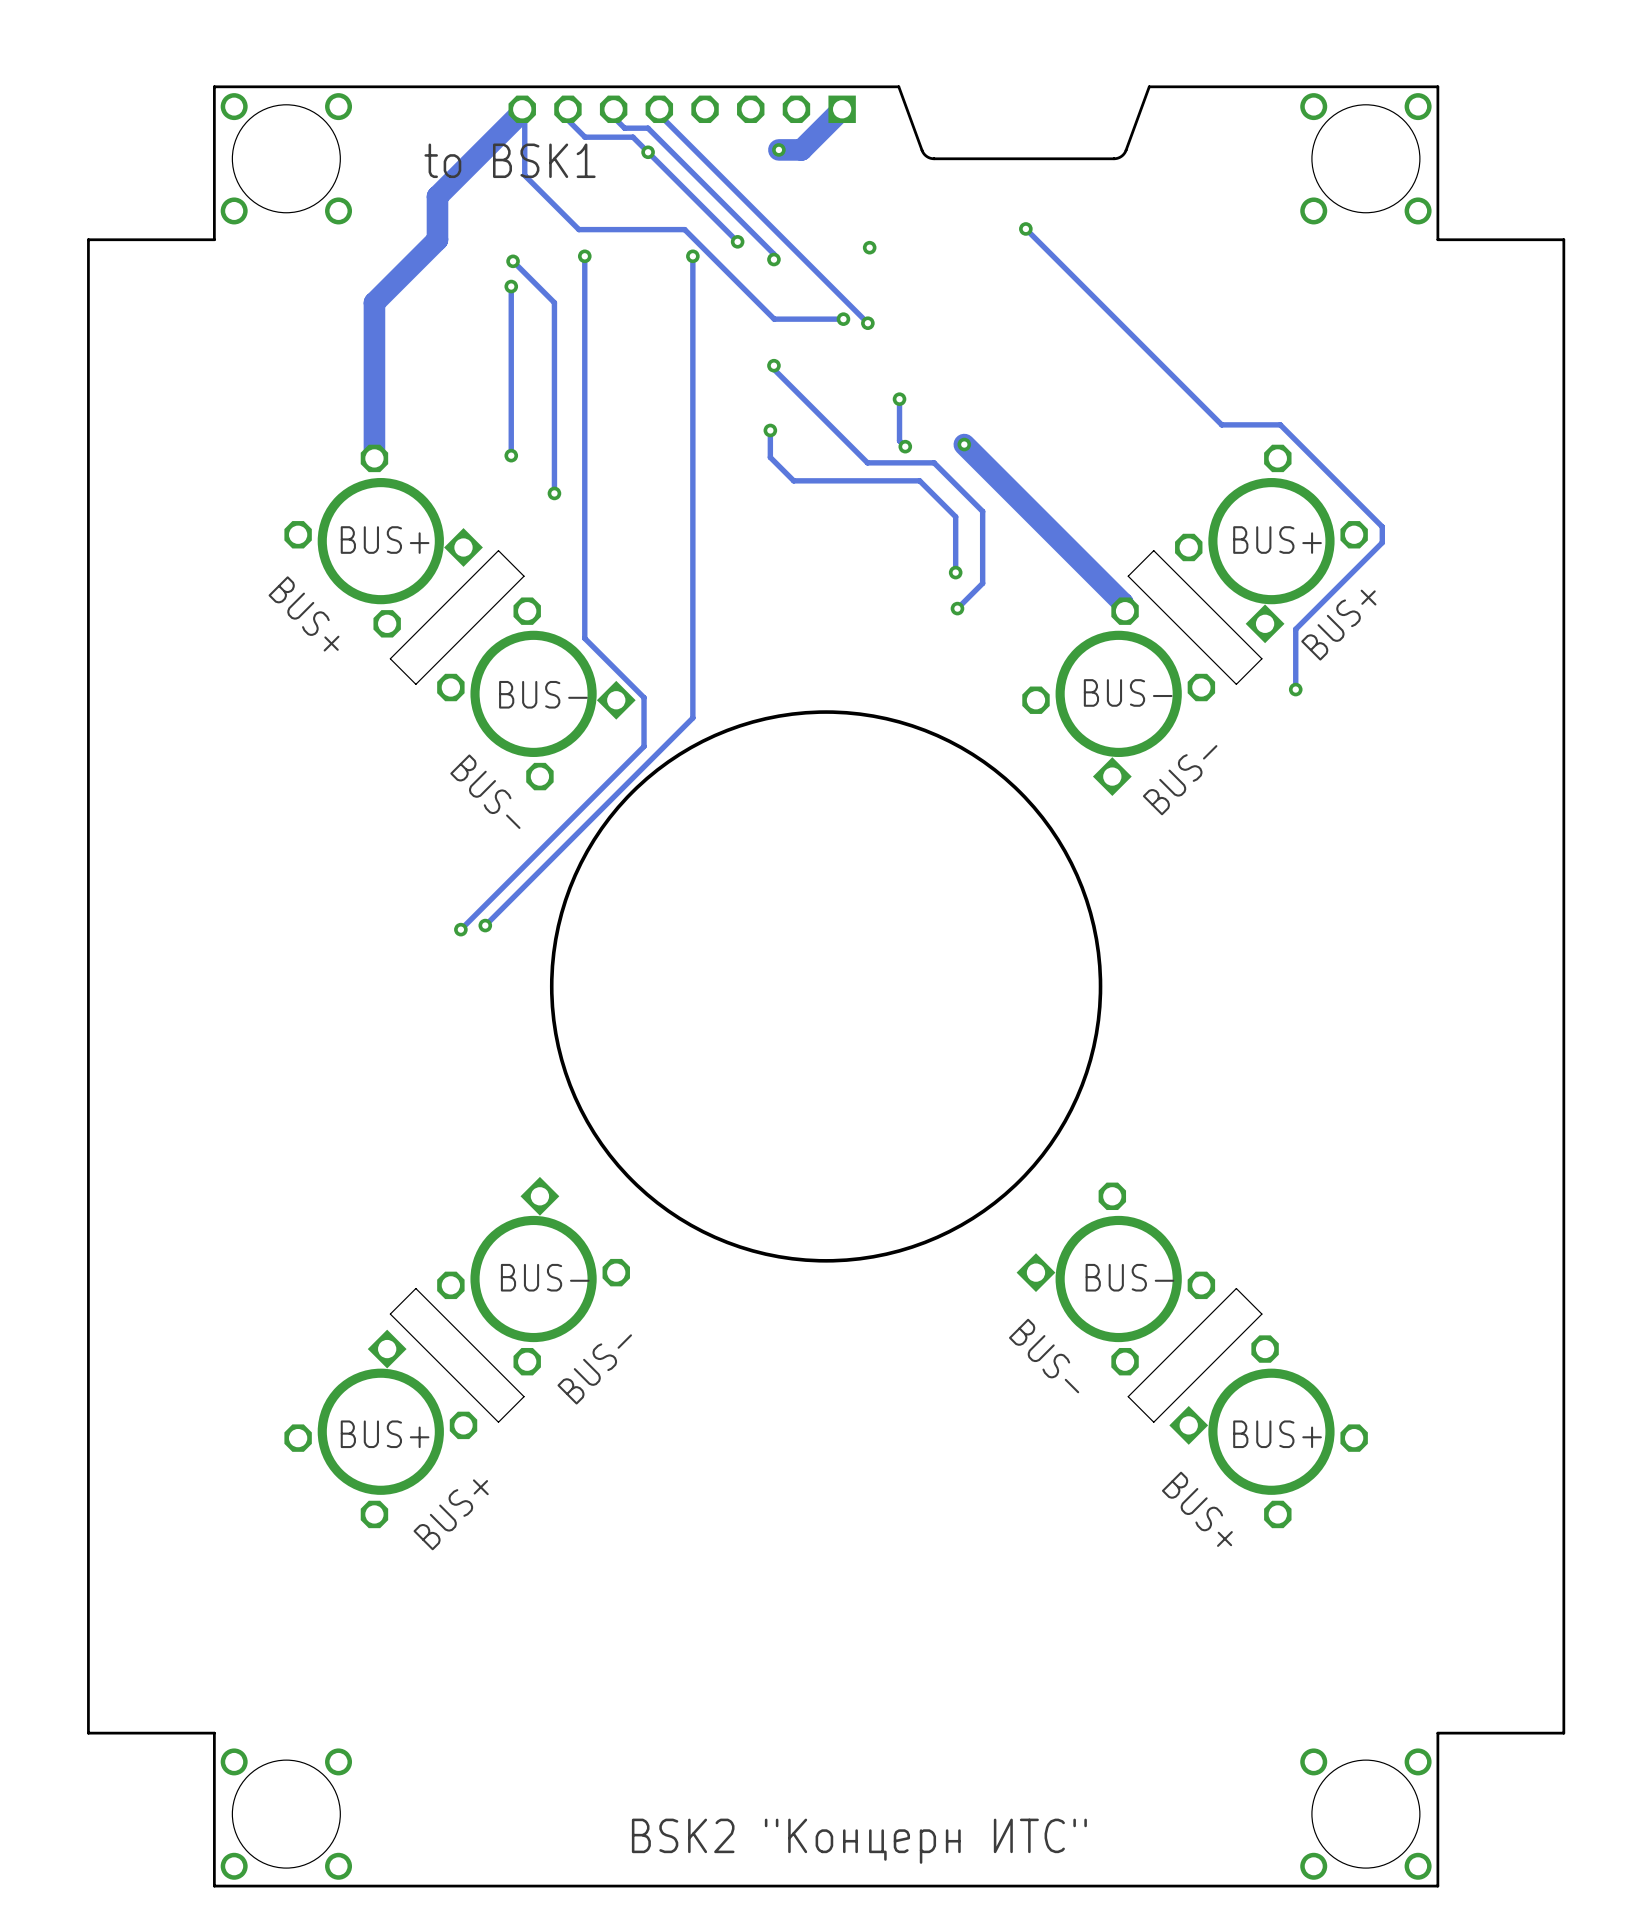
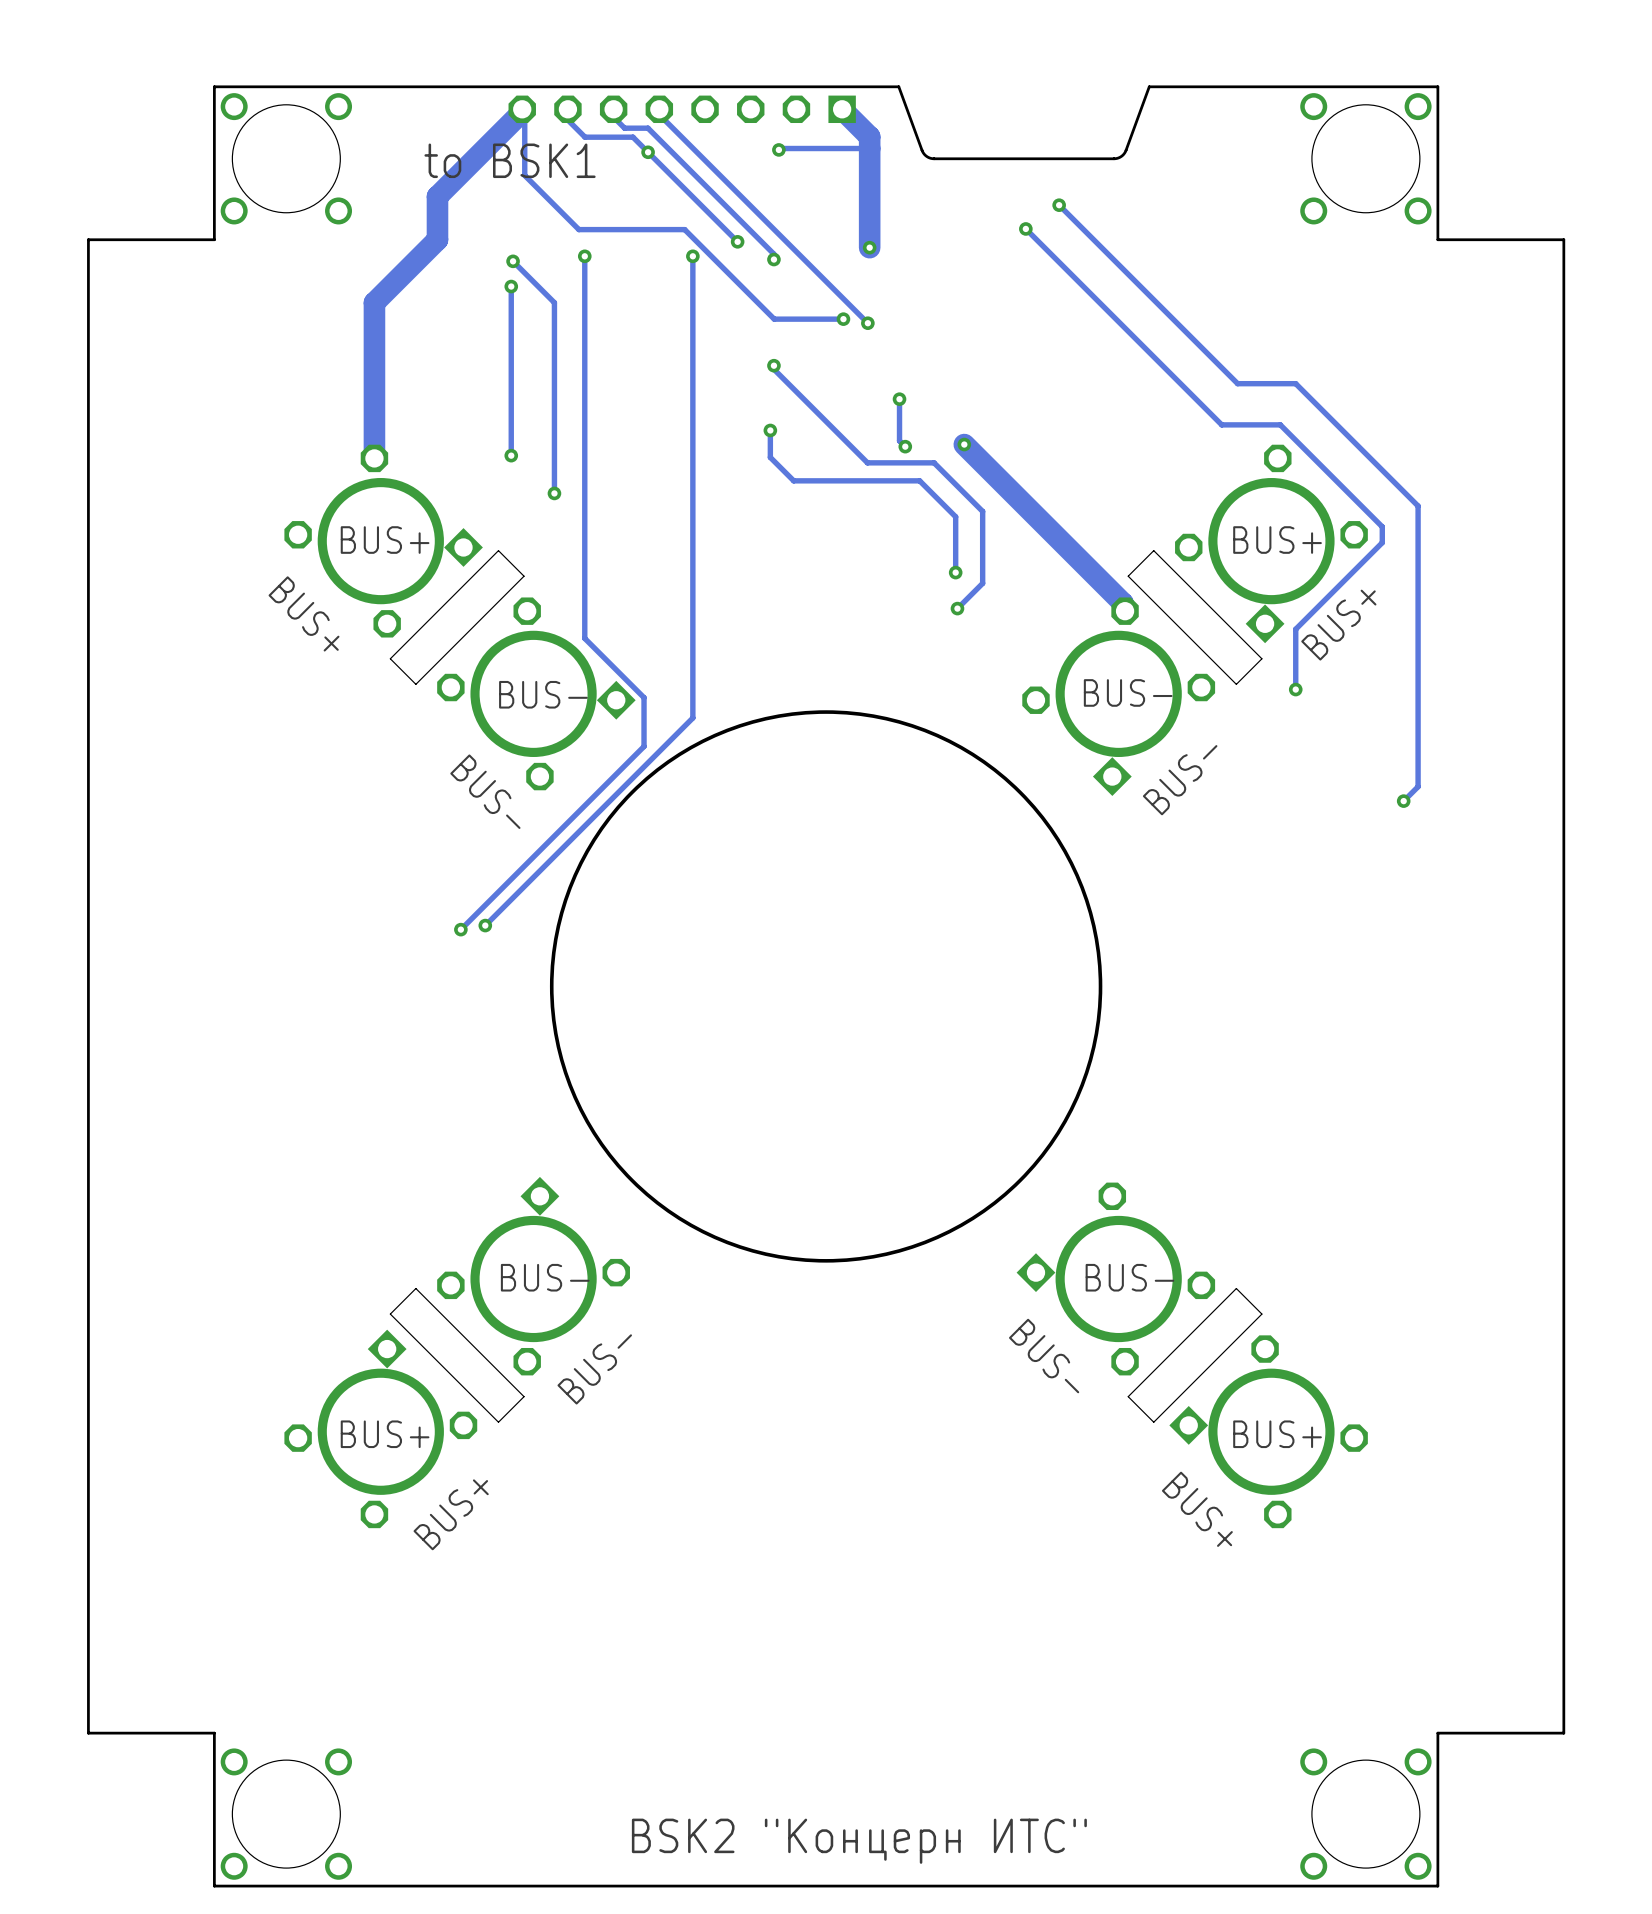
track: (842, 109) (801, 149) (778, 149) -> (869, 148) (778, 149)
track: none -> (842, 109) (869, 136) (869, 247)
track: none -> (1059, 205) (1237, 383) (1295, 383) (1418, 506) (1418, 786) (1403, 801)
via: none -> (1059, 205)
via: none -> (1403, 801)

